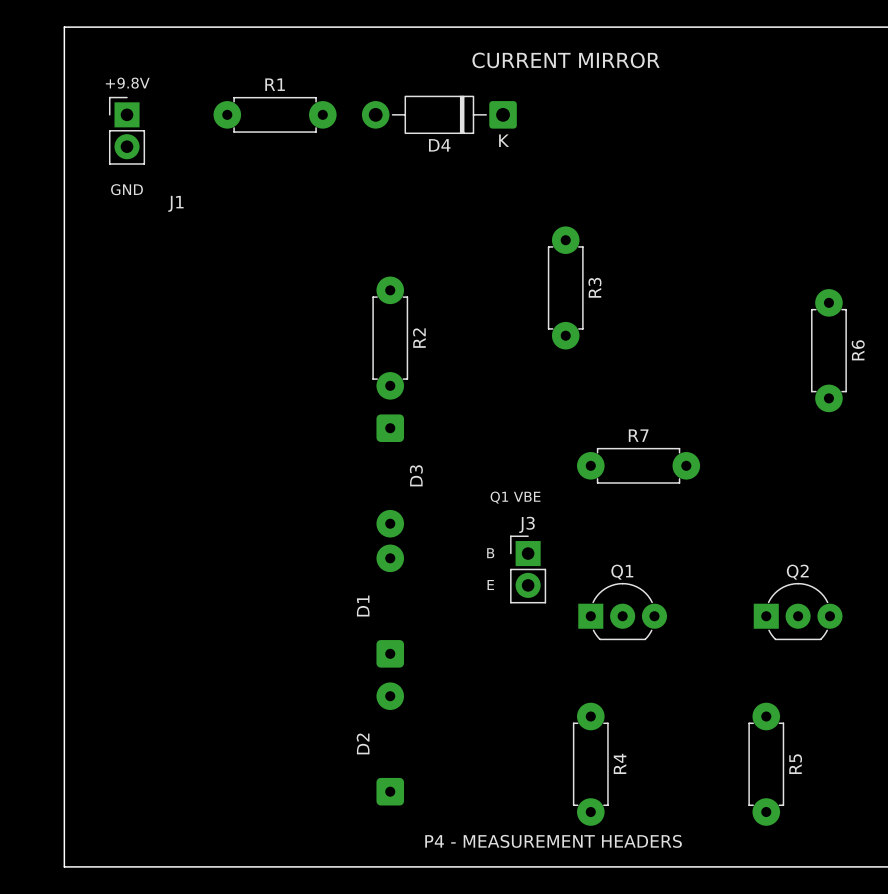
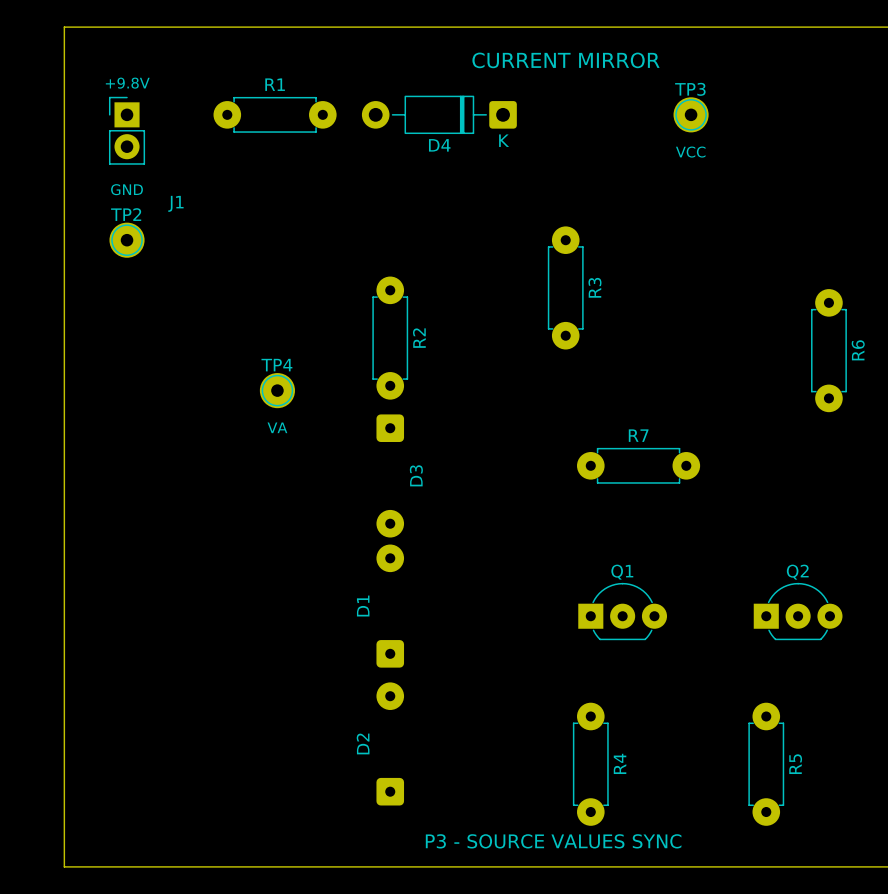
TP3: none -> (691, 114)
text: none -> VCC (690, 152)
TP2: none -> (127, 240)
TP4: none -> (277, 390)
text: none -> VA (277, 427)
text: Q1 VBE (515, 497) -> none
text: B (490, 553) -> none
J3: (528, 569) -> none
text: E (490, 585) -> none
text: P4 - MEASUREMENT HEADERS (553, 841) -> P3 - SOURCE VALUES SYNC (553, 841)

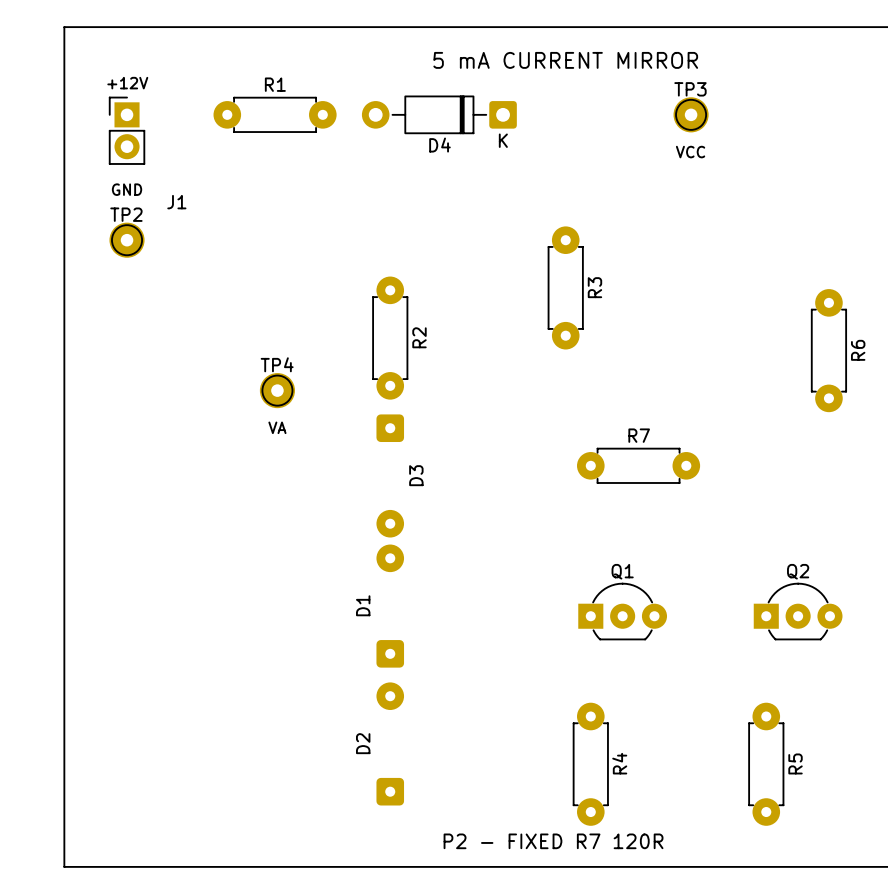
text: CURRENT MIRROR (566, 60) -> 5 mA CURRENT MIRROR (565, 60)
text: +9.8V (127, 83) -> +12V (127, 83)
text: P3 - SOURCE VALUES SYNC (553, 841) -> P2 - FIXED R7 120R (553, 841)

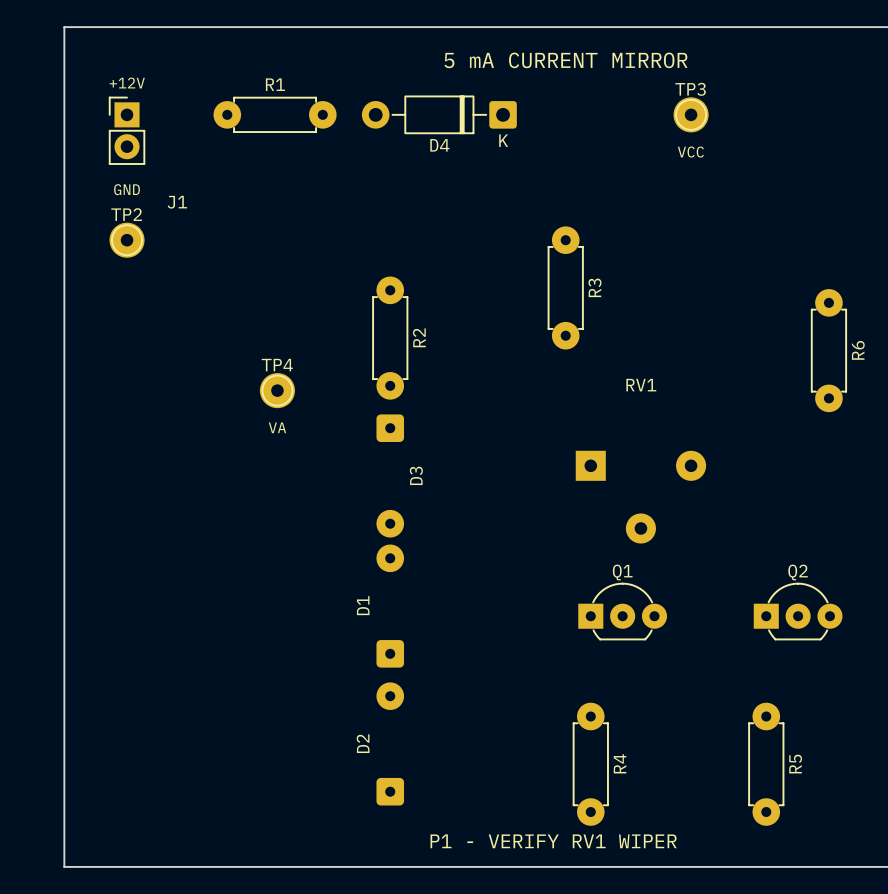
R7: (638, 465) -> none
RV1: none -> (640, 497)
text: P2 - FIXED R7 120R (553, 841) -> P1 - VERIFY RV1 WIPER (553, 841)

